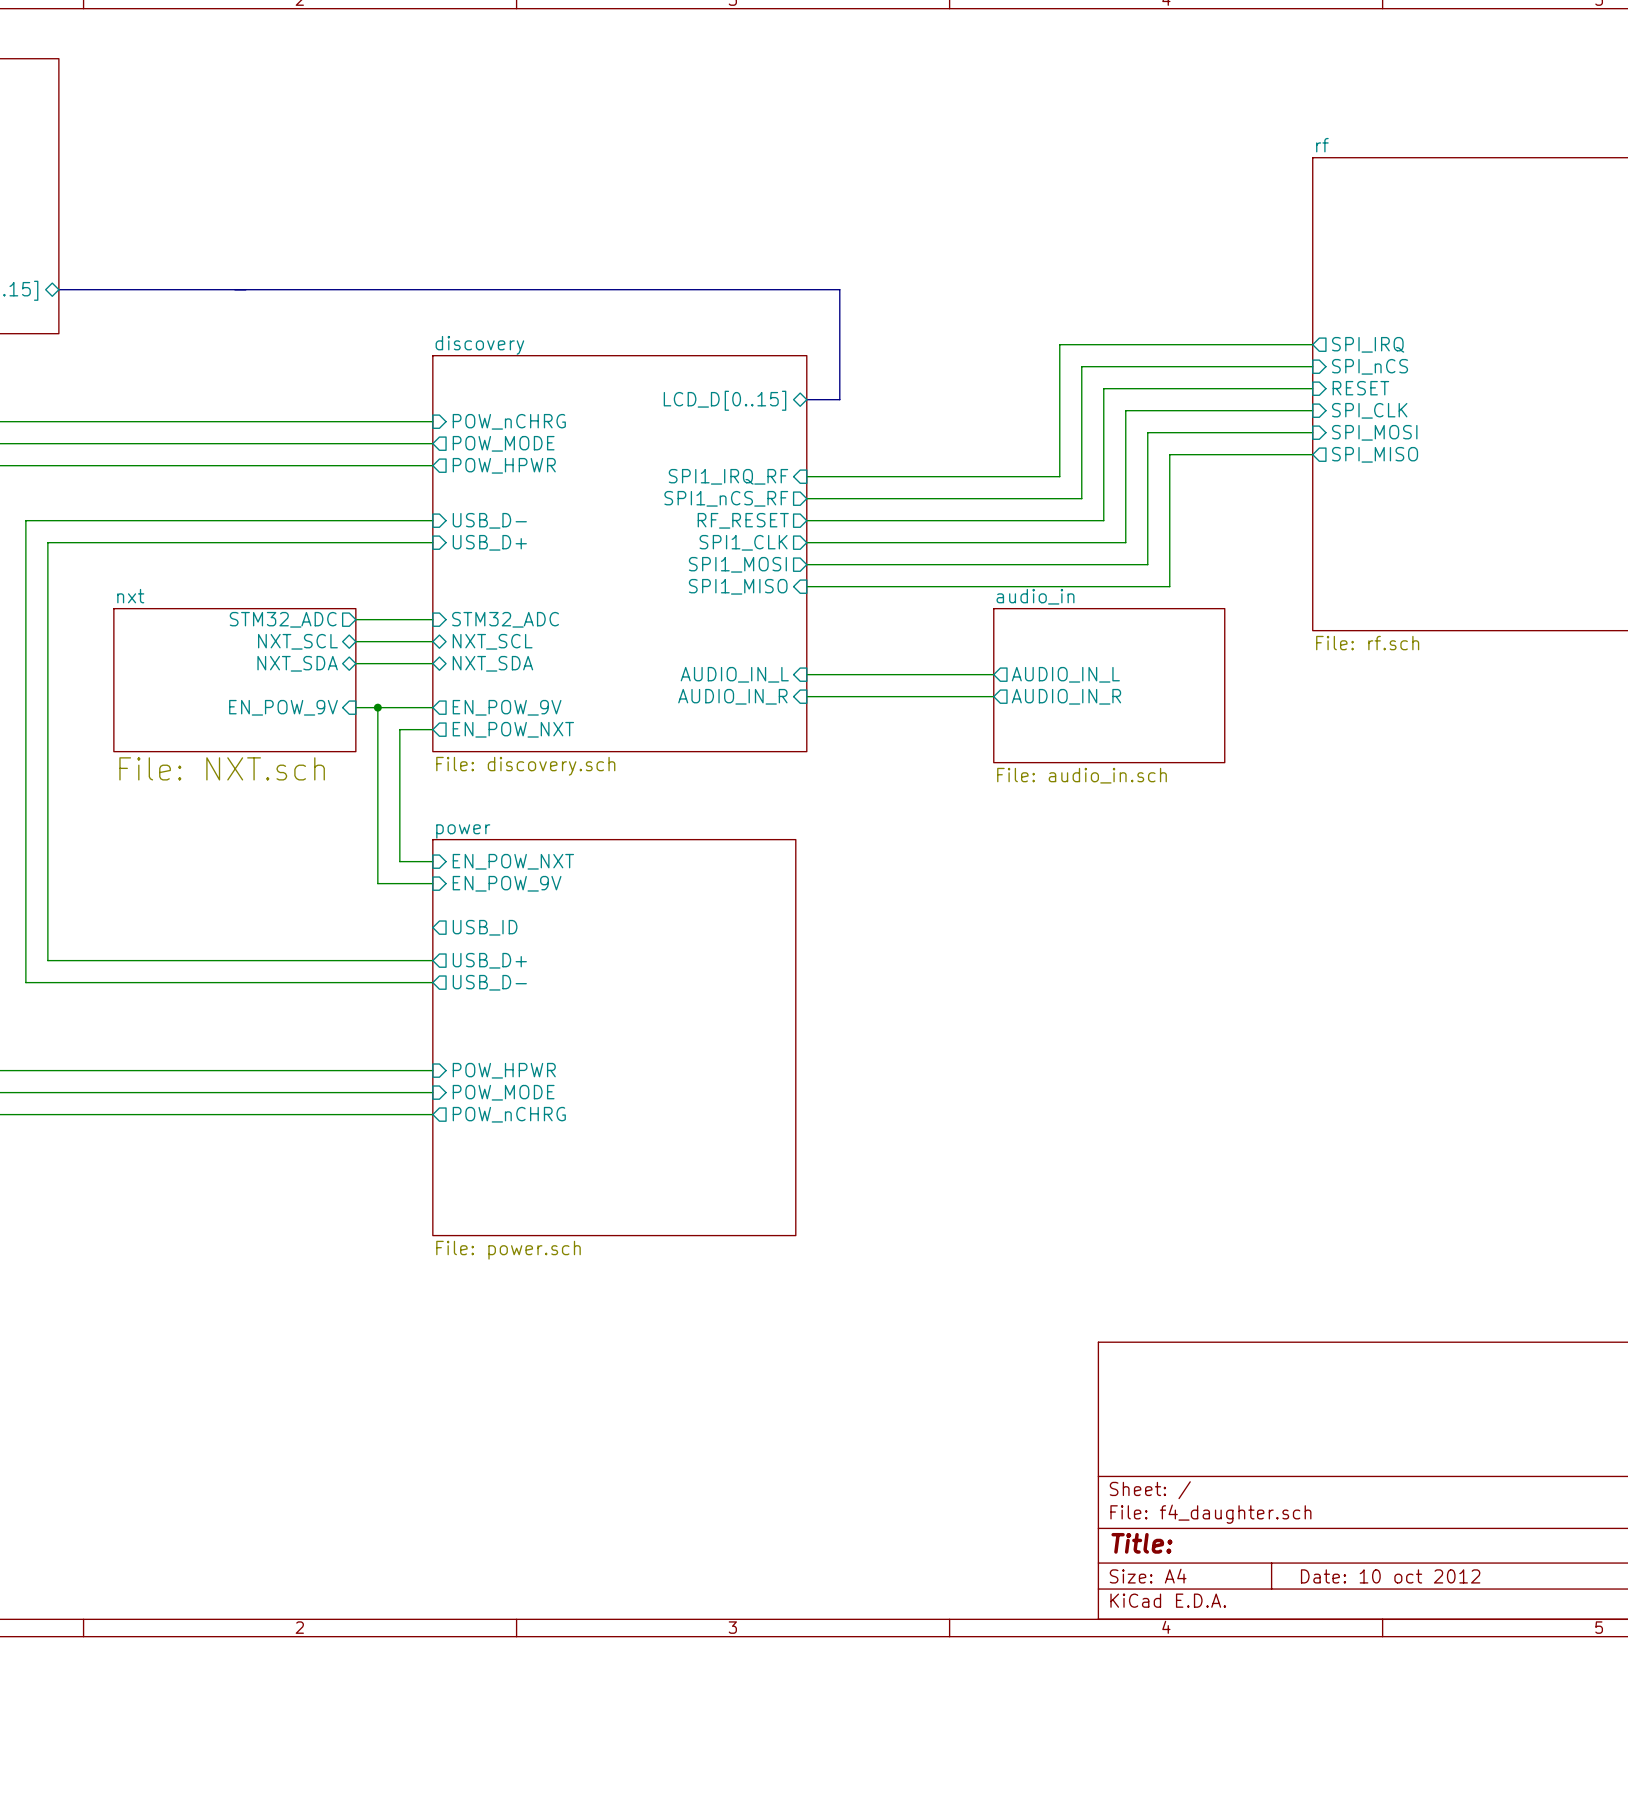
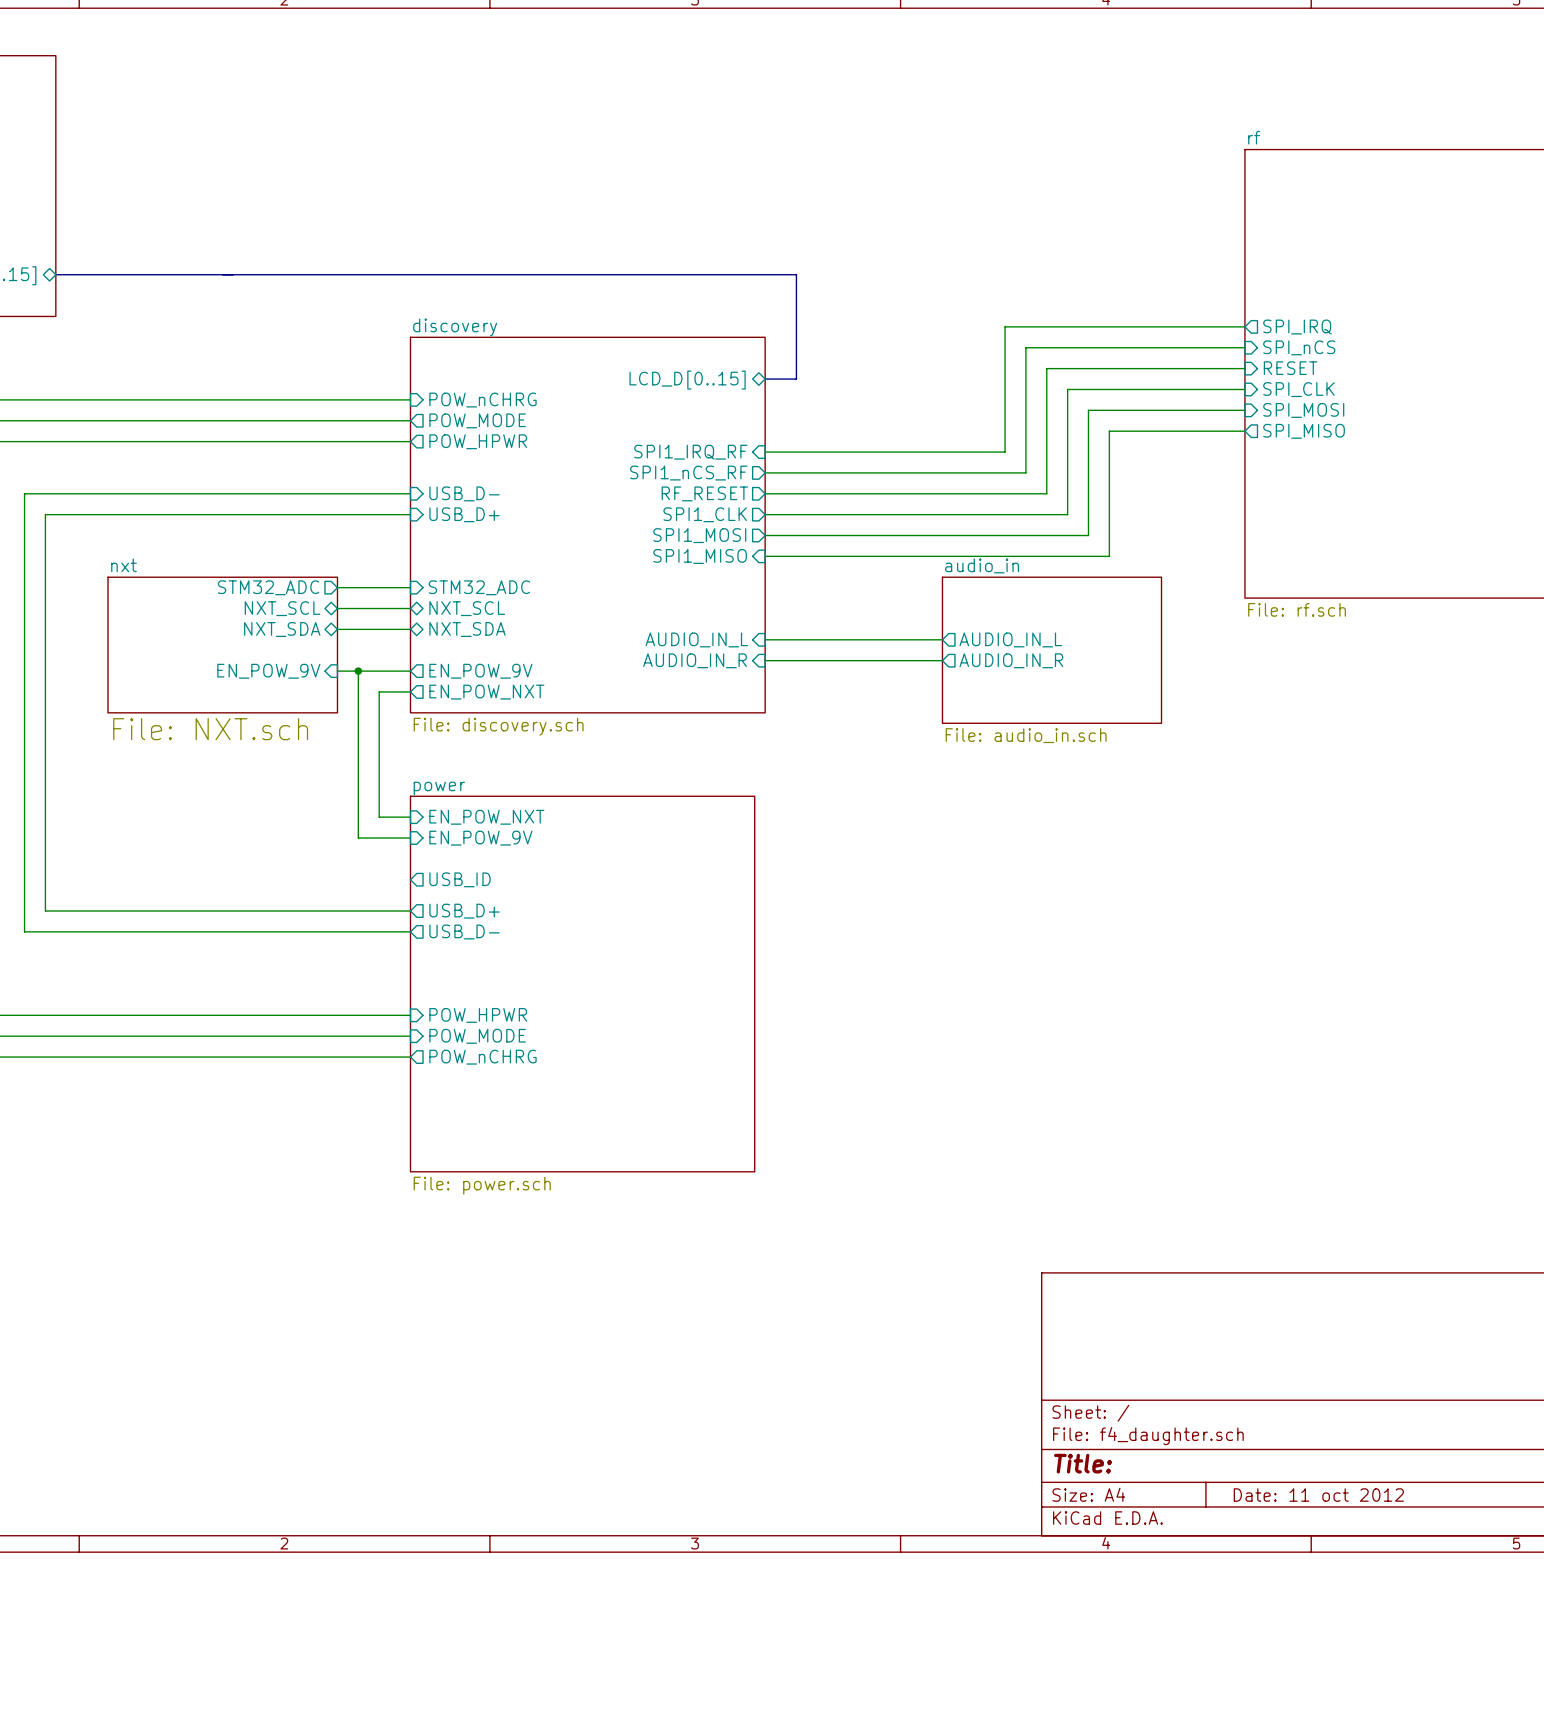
title block: Date: 10 oct 2012 (1390, 1576) -> Date: 11 oct 2012 (1318, 1495)

